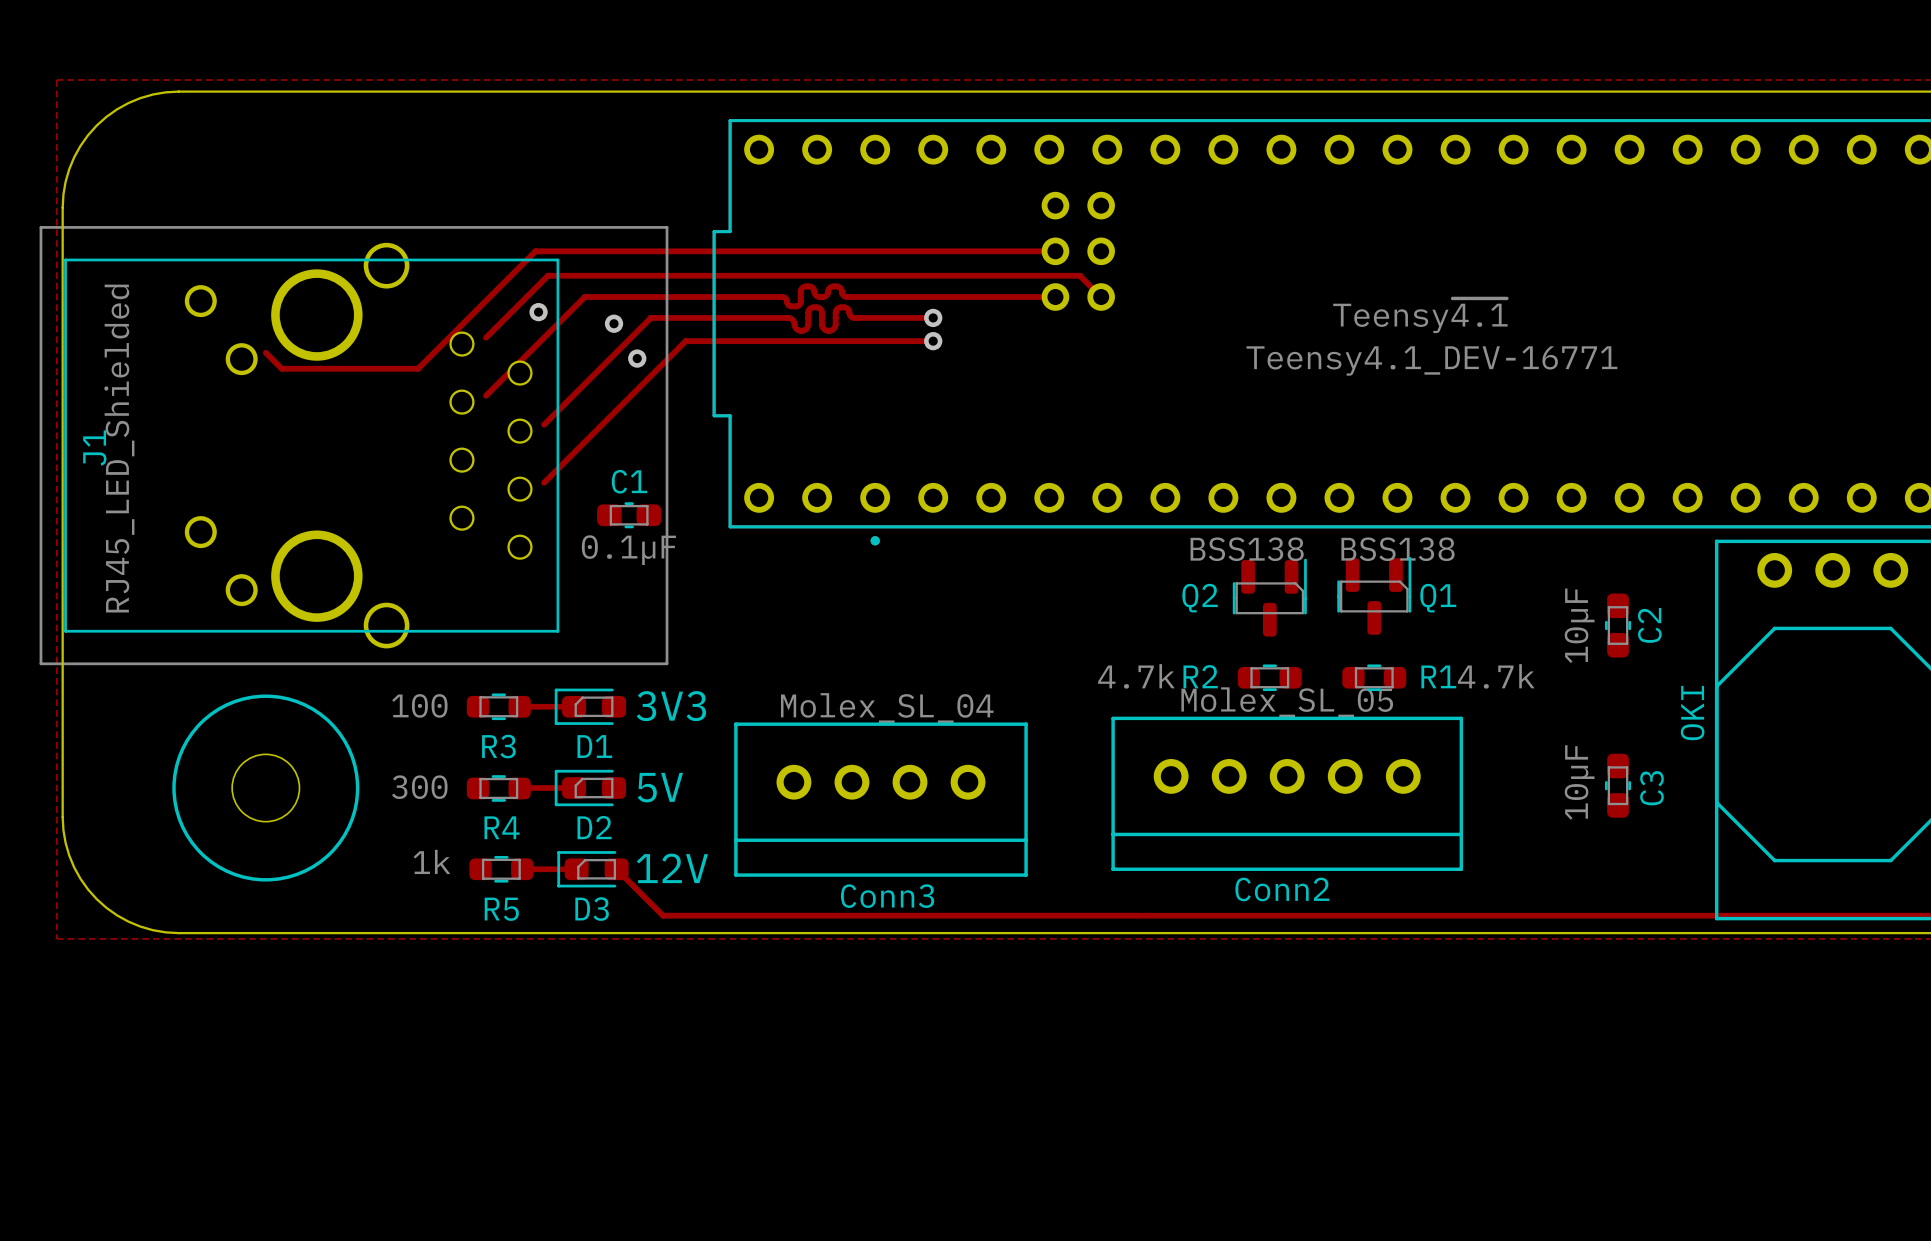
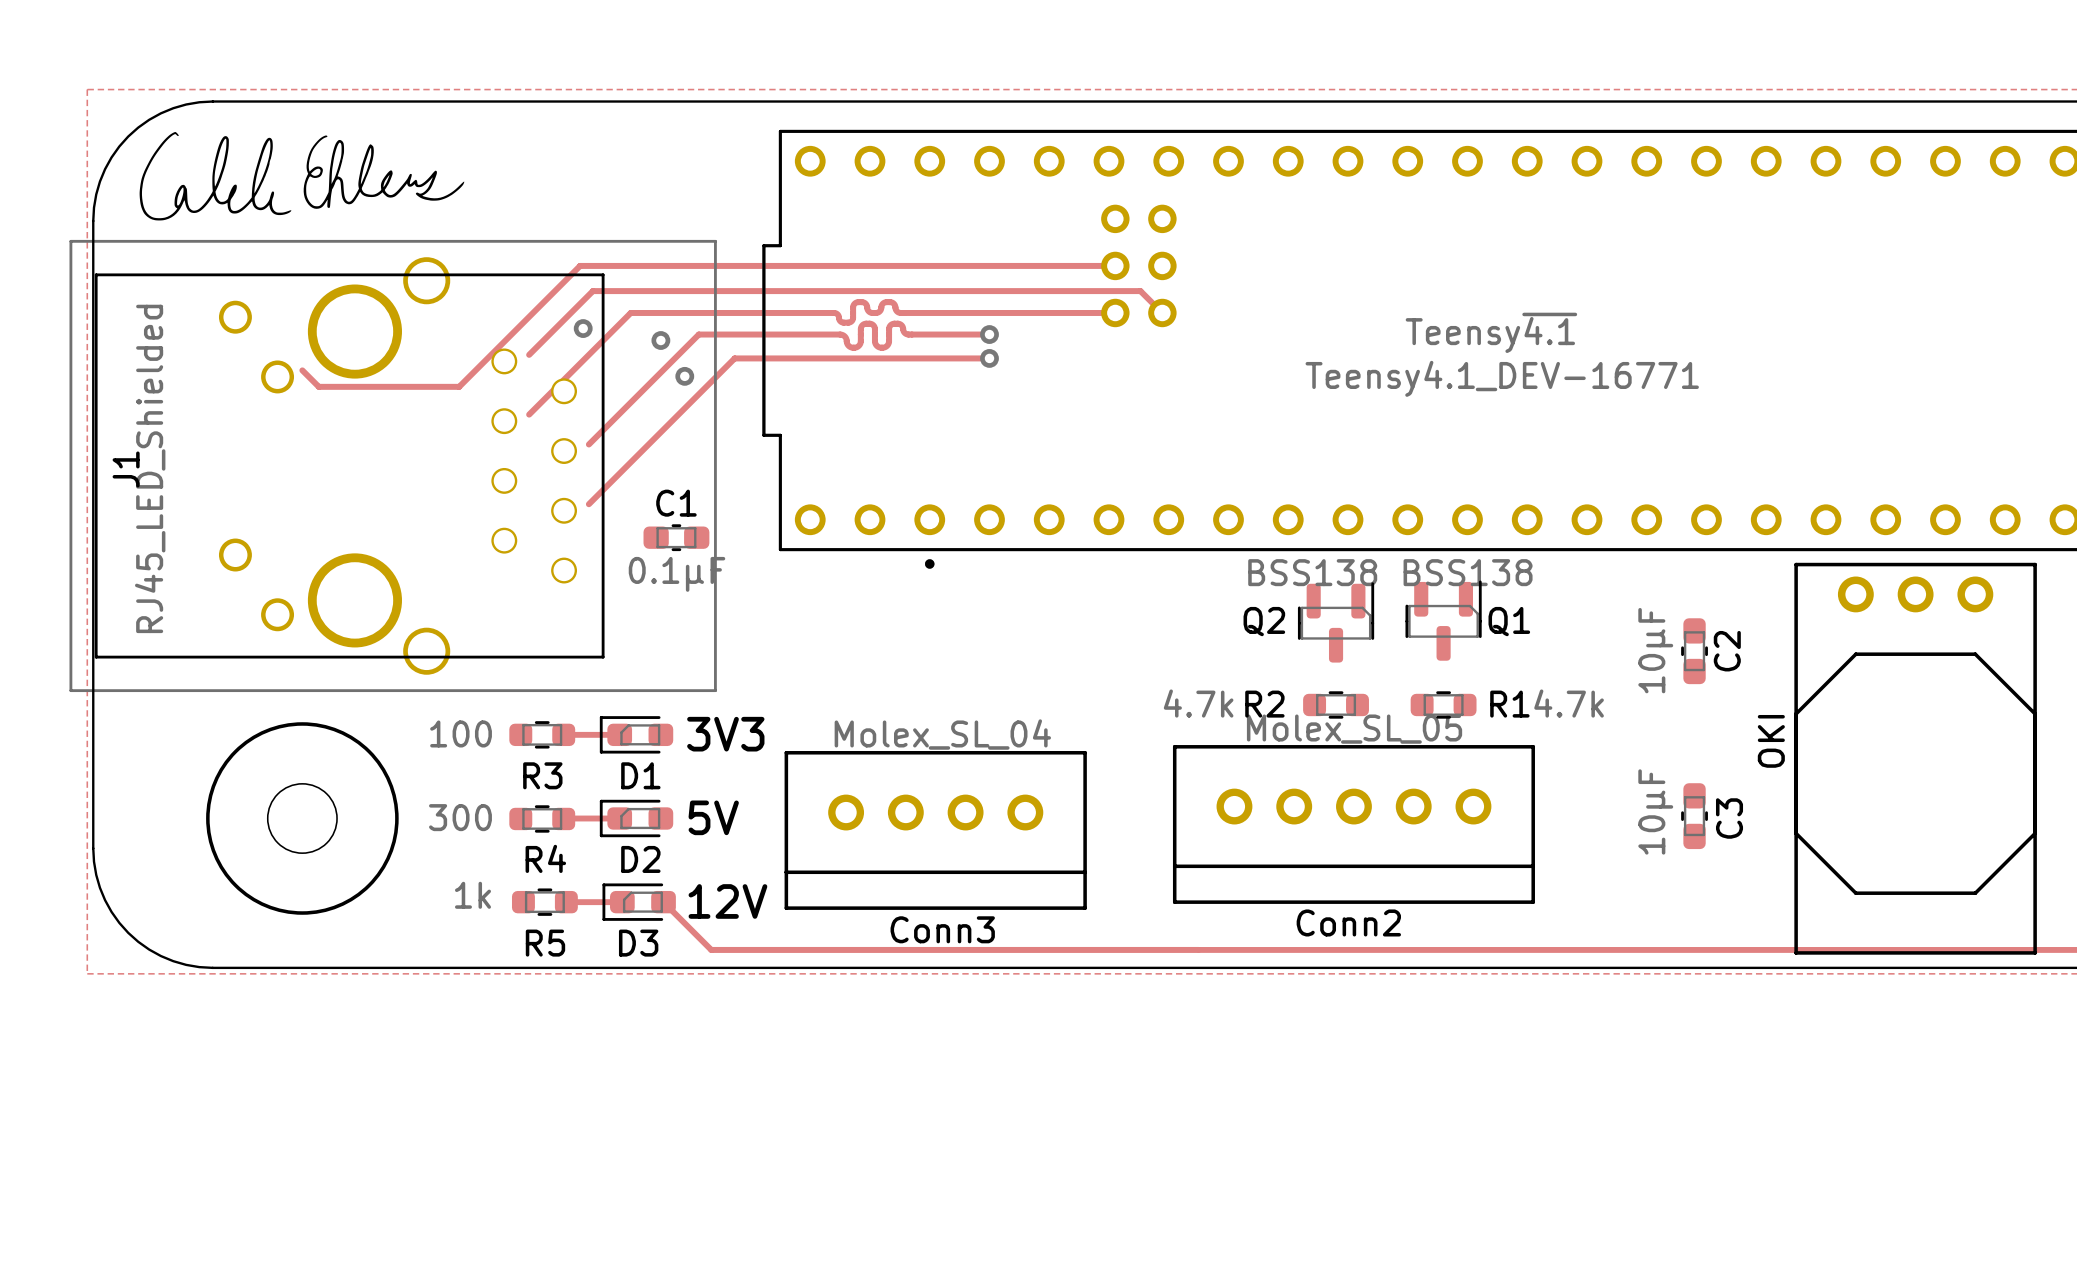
drawing: none -> [139, 131, 465, 221]

